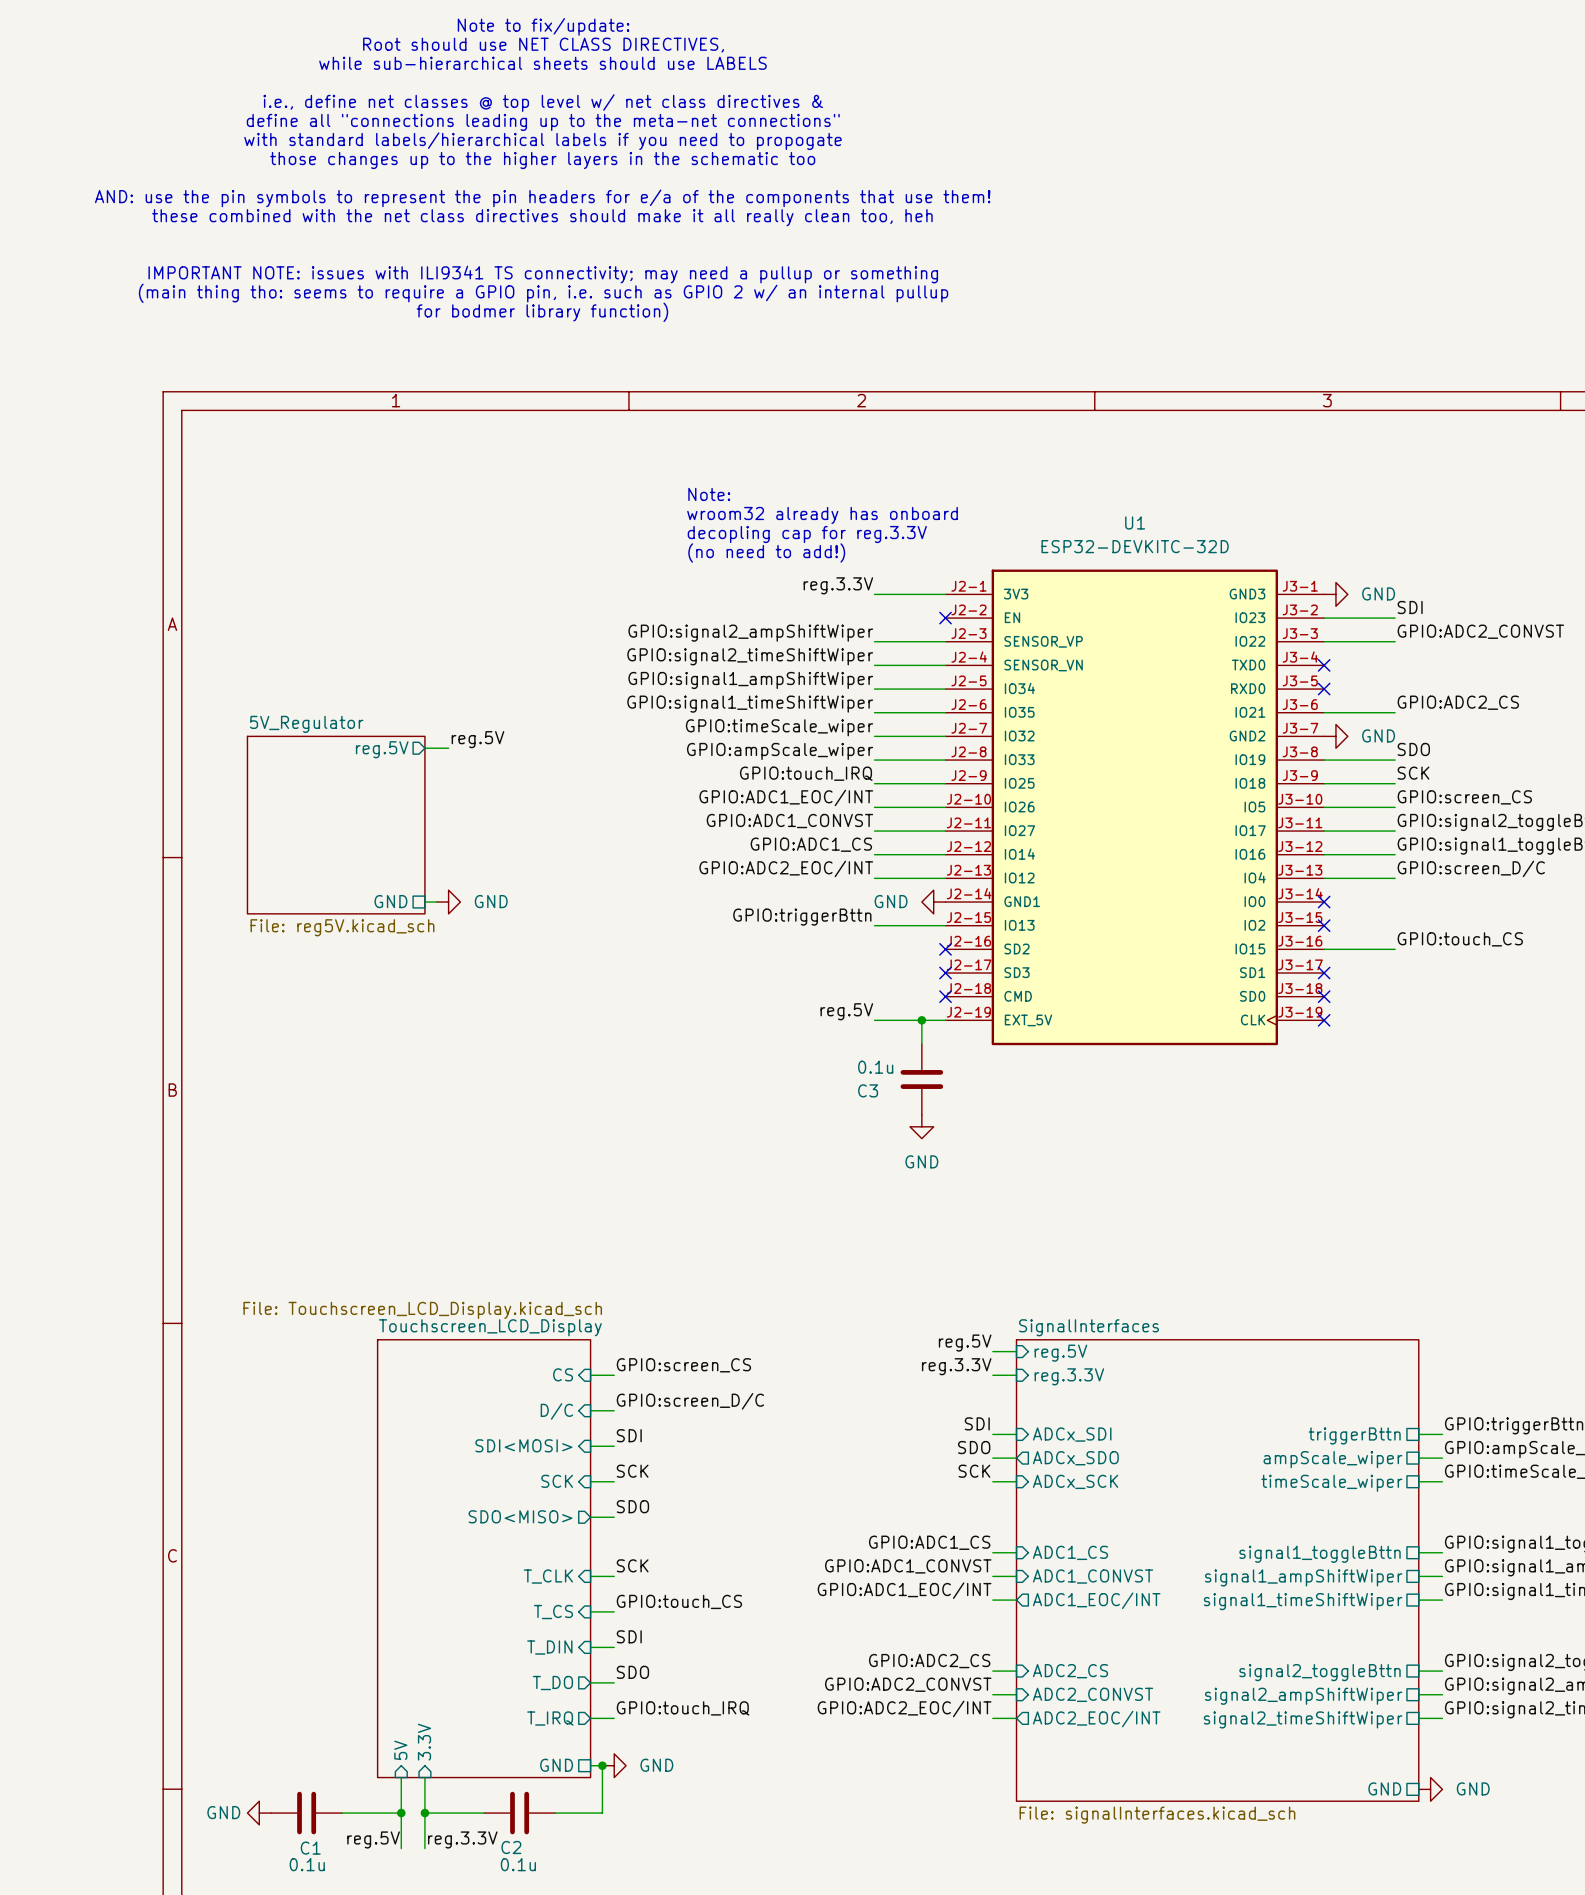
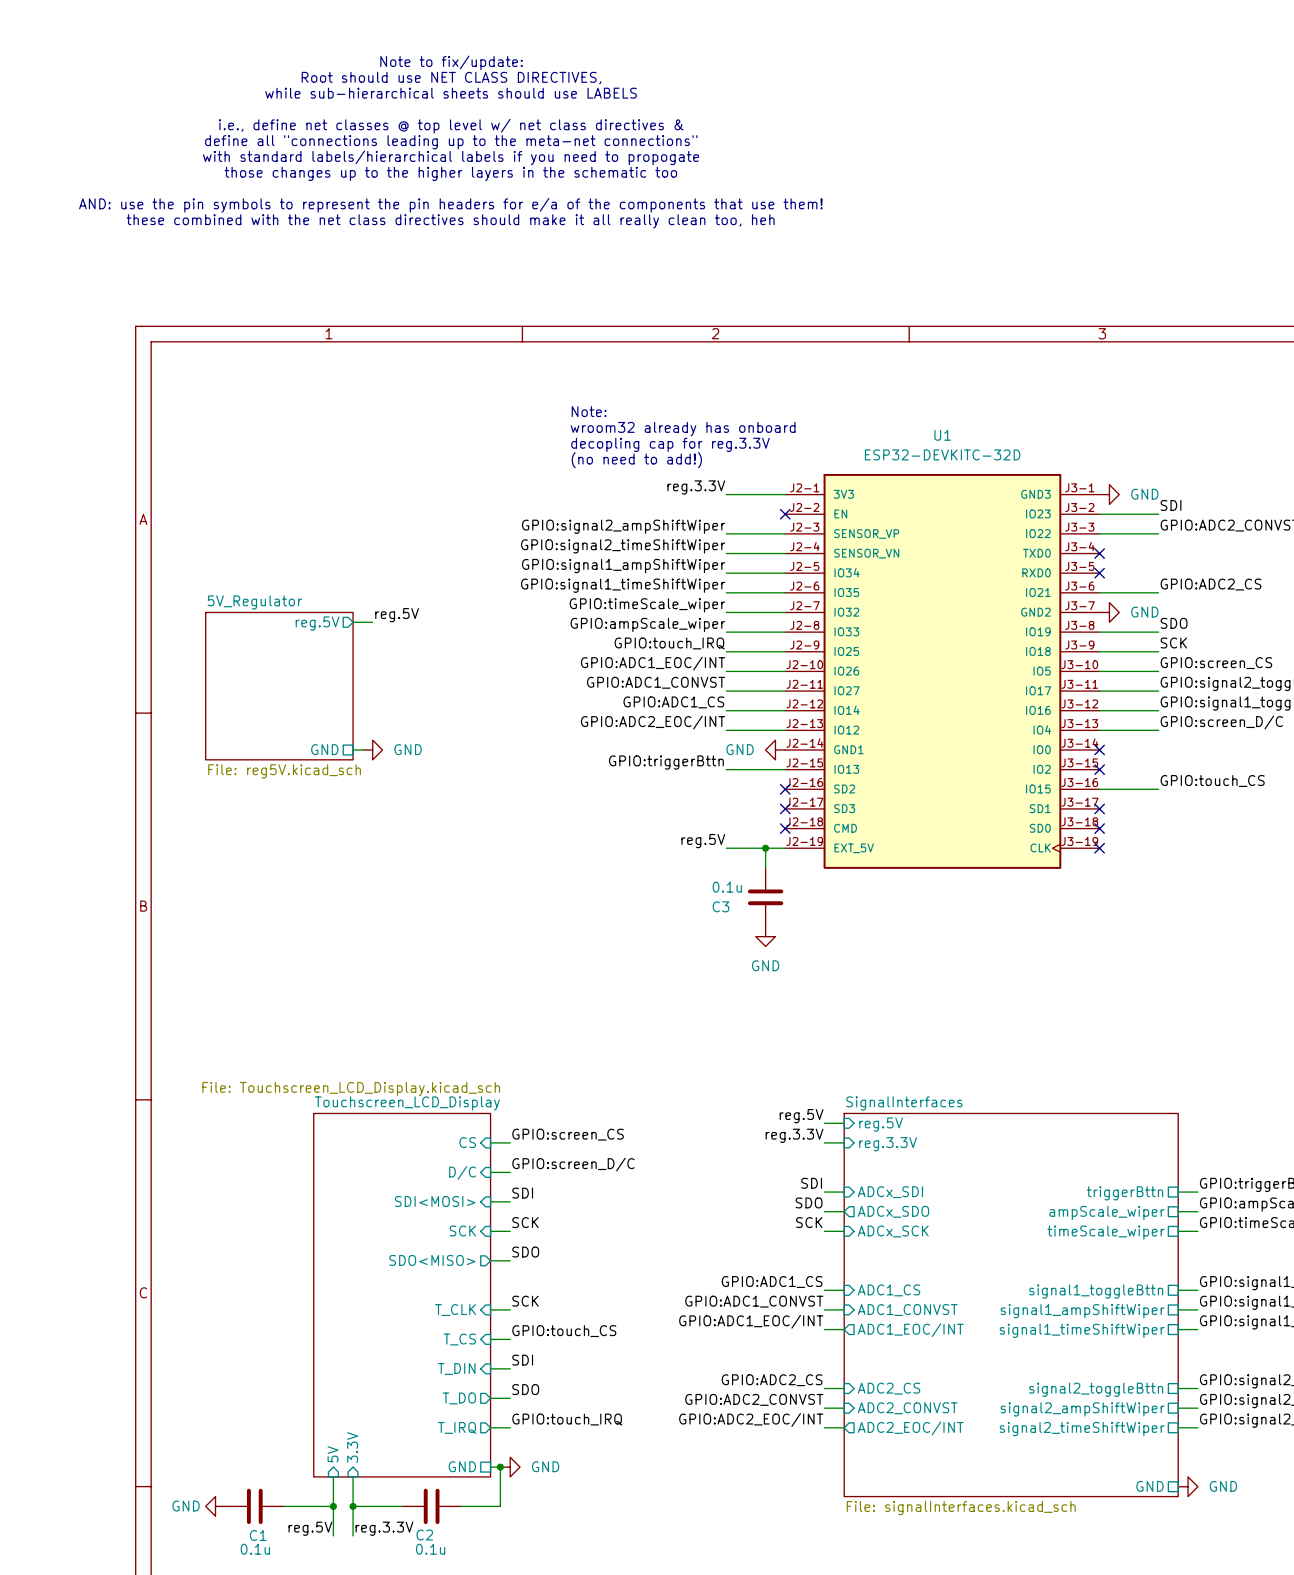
text position: Note to fix/update: (543, 26) -> Note to fix/update: (451, 62)
text position: Root should use NET CLASS DIRECTIVES, (543, 45) -> Root should use NET CLASS DIRECTIVES, (451, 78)
text position: while sub-hierarchical sheets should use LABELS (542, 63) -> while sub-hierarchical sheets should use LABELS (451, 93)
text position: i.e., define net classes @ top level w/ net class directives & (543, 103) -> i.e., define net classes @ top level w/ net class directives & (451, 126)
text position: define all "connections leading up to the meta-net connections" (543, 122) -> define all "connections leading up to the meta-net connections" (451, 142)
text position: with standard labels/hierarchical labels if you need to propogate (542, 141) -> with standard labels/hierarchical labels if you need to propogate (451, 157)
text position: those changes up to the higher layers in the schematic too (542, 160) -> those changes up to the higher layers in the schematic too (450, 173)
text position: AND: use the pin symbols to represent the pin headers for e/a of the components that use them! (542, 198) -> AND: use the pin symbols to represent the pin headers for e/a of the components that use them! (450, 205)
text position: these combined with the net class directives should make it all really clean too, heh (542, 217) -> these combined with the net class directives should make it all really clean too, heh (450, 221)
text: IMPORTANT NOTE: issues with ILI9341 TS connectivity; may need a pullup or something (543, 274) -> none
text: (main thing tho: seems to require a GPIO pin, i.e. such as GPIO 2 w/ an internal pullup (543, 293) -> none
text: for bodmer library function) (542, 312) -> none

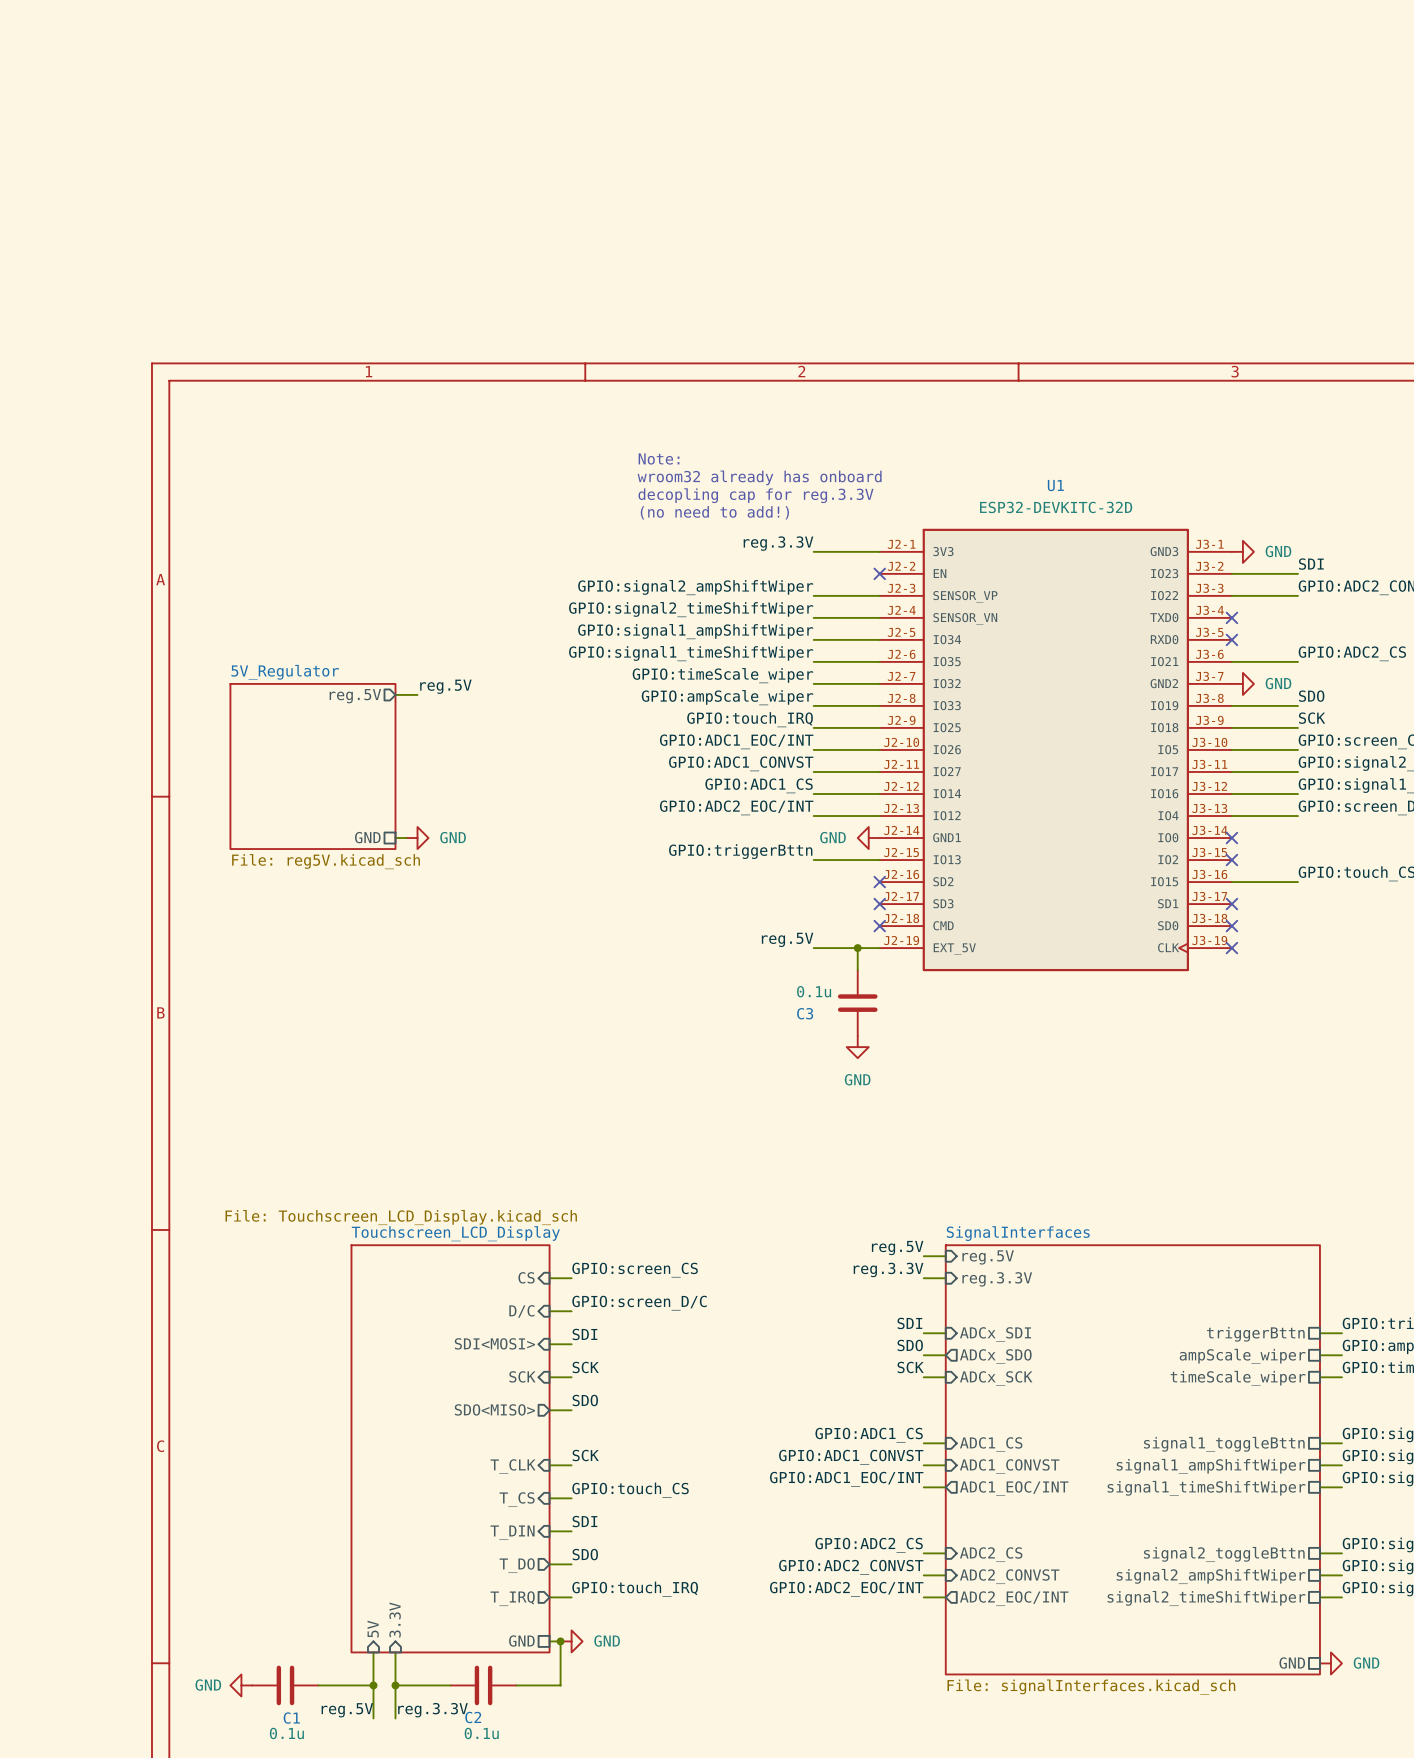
text: Note to fix/update: (451, 62) -> none
text: Root should use NET CLASS DIRECTIVES, (451, 78) -> none
text: while sub-hierarchical sheets should use LABELS (451, 93) -> none
text: i.e., define net classes @ top level w/ net class directives & (451, 126) -> none
text: define all "connections leading up to the meta-net connections" (451, 142) -> none
text: with standard labels/hierarchical labels if you need to propogate (451, 157) -> none
text: those changes up to the higher layers in the schematic too (450, 173) -> none
text: AND: use the pin symbols to represent the pin headers for e/a of the components that use them! (450, 205) -> none
text: these combined with the net class directives should make it all really clean too, heh (450, 221) -> none

